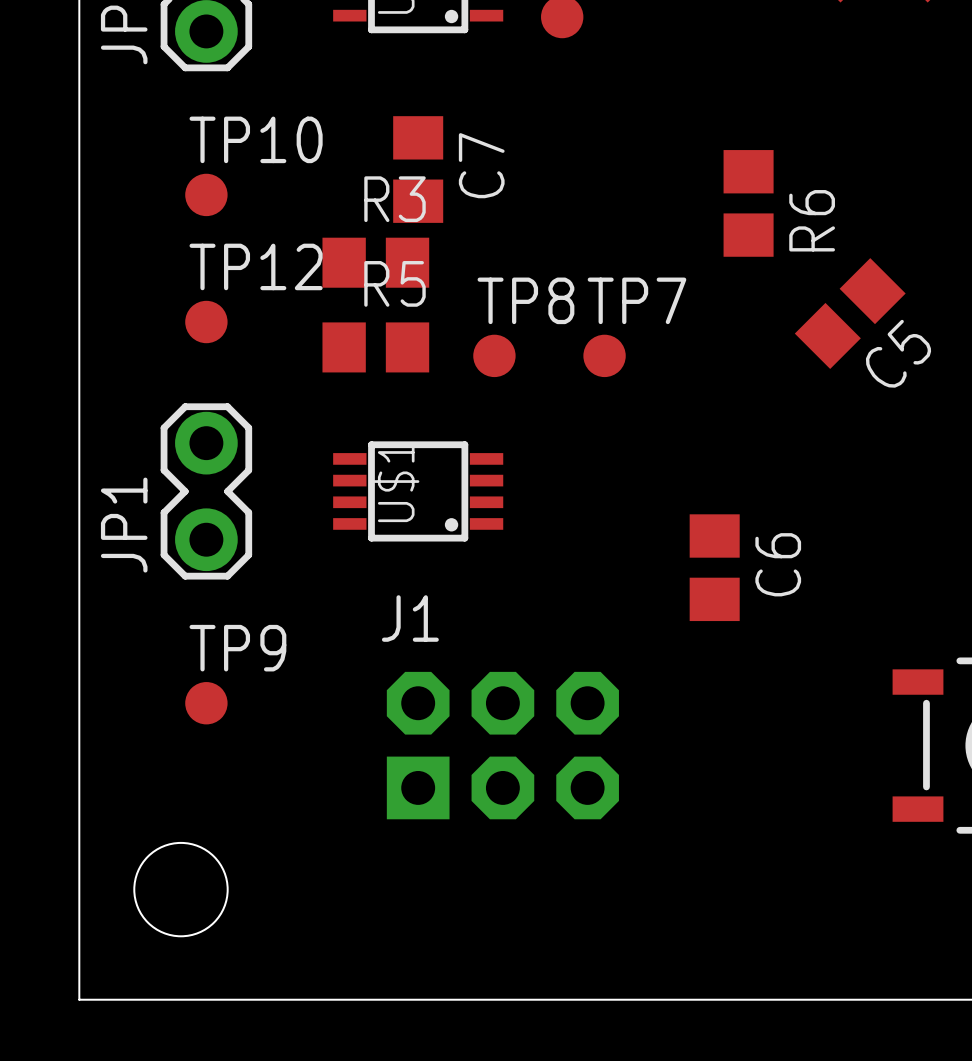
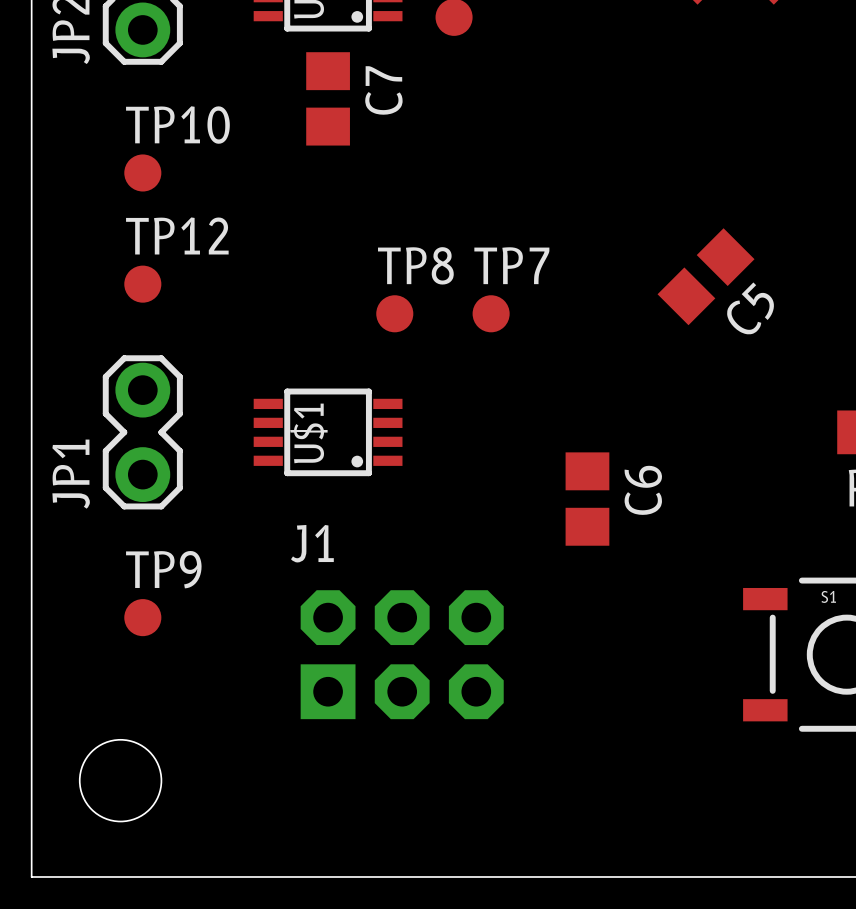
C7 position: (418, 169) -> (328, 98)
R6: (748, 203) -> none
R3: (375, 262) -> none
R5: (375, 347) -> none

